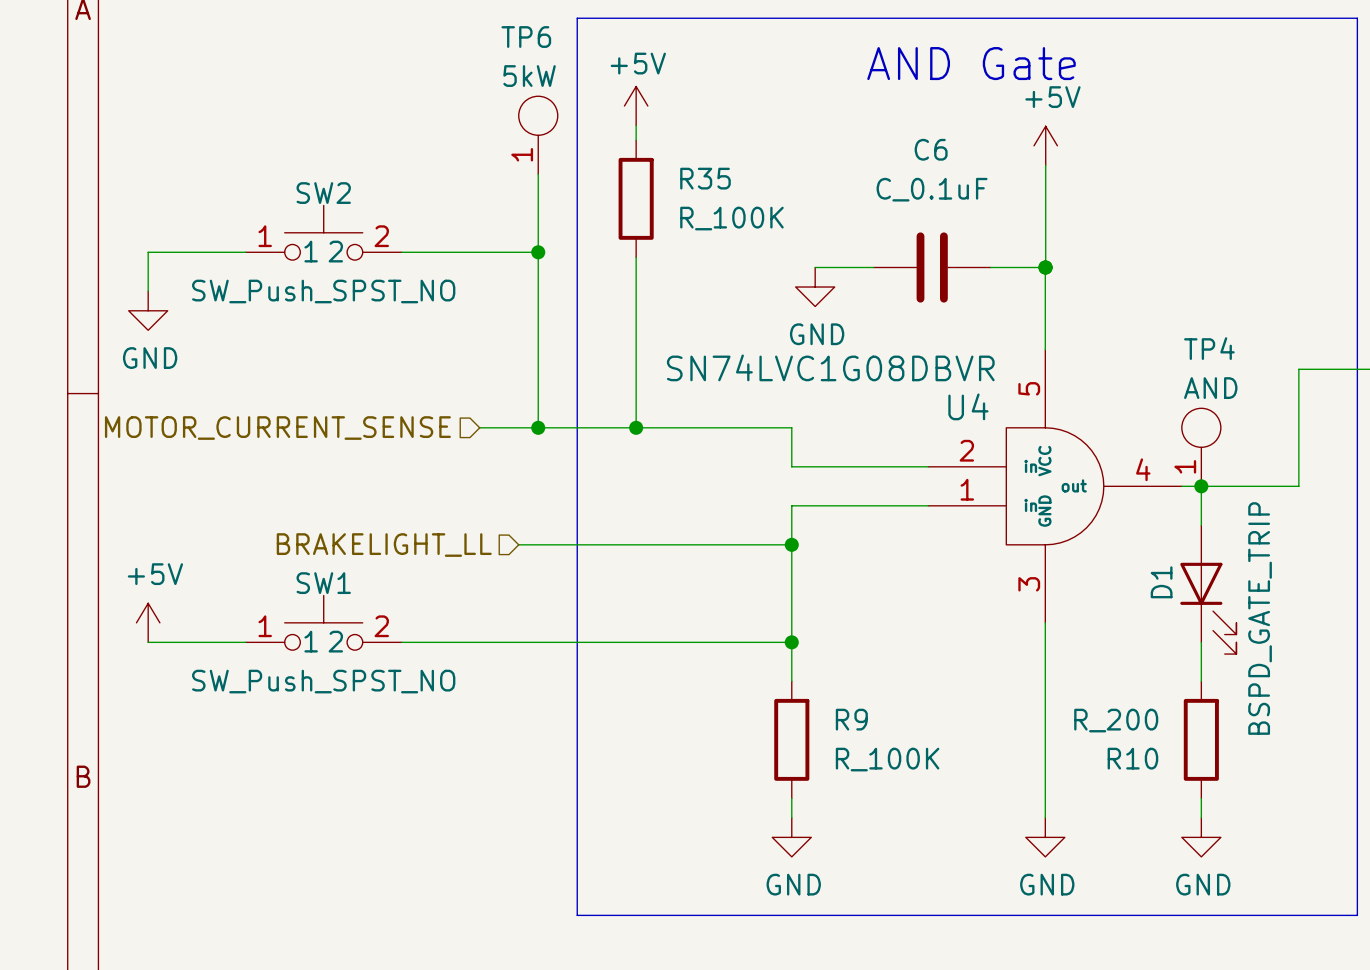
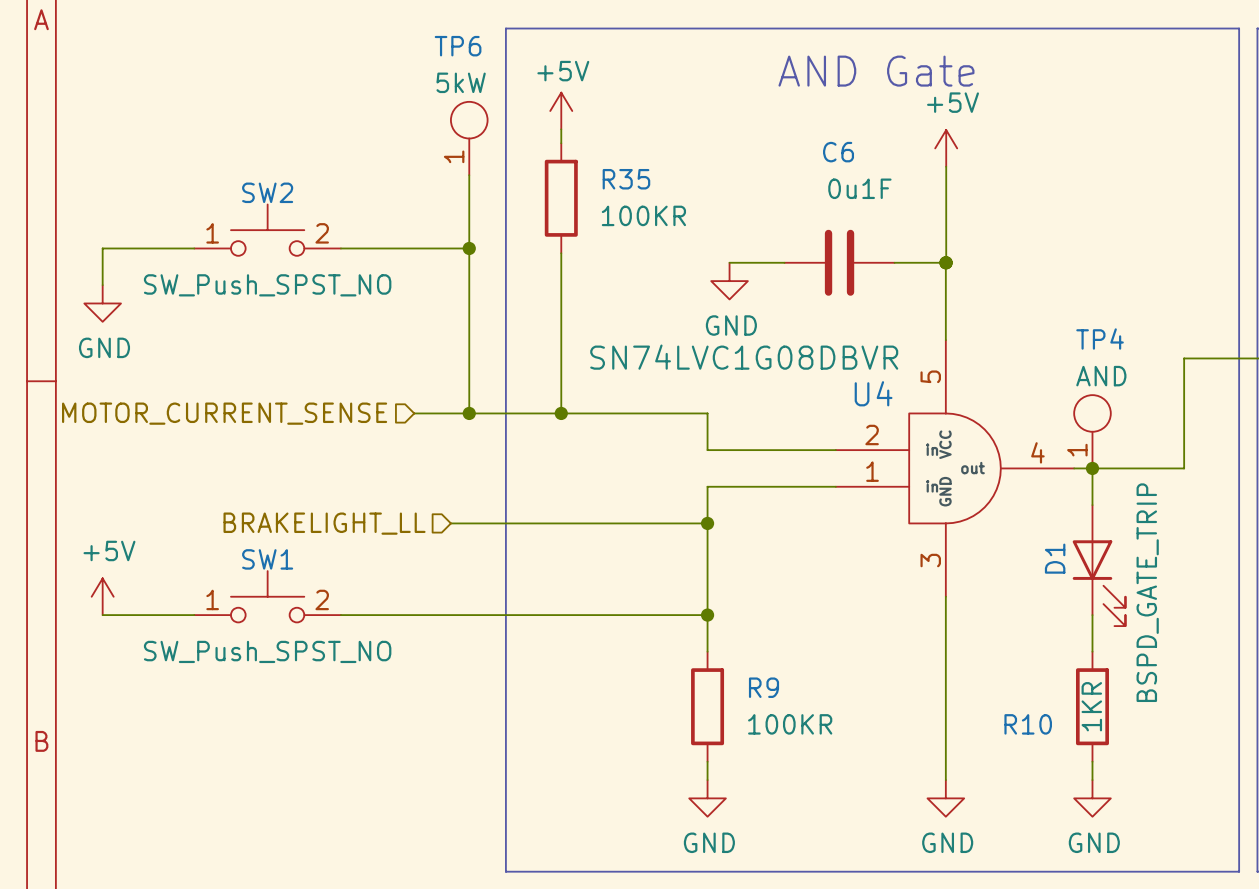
C6 value: C_0.1uF (932, 189) -> 0u1F (859, 188)
R35 value: R_100K (731, 218) -> 100KR (643, 215)
SW2 pin name: 1 (311, 251) -> none
SW2 pin name: 2 (335, 251) -> none
SW1 pin name: 1 (311, 641) -> none
SW1 pin name: 2 (335, 641) -> none
R10 value: R_200 (1116, 720) -> 1KR (1091, 706)
R9 value: R_100K (887, 759) -> 100KR (790, 724)

